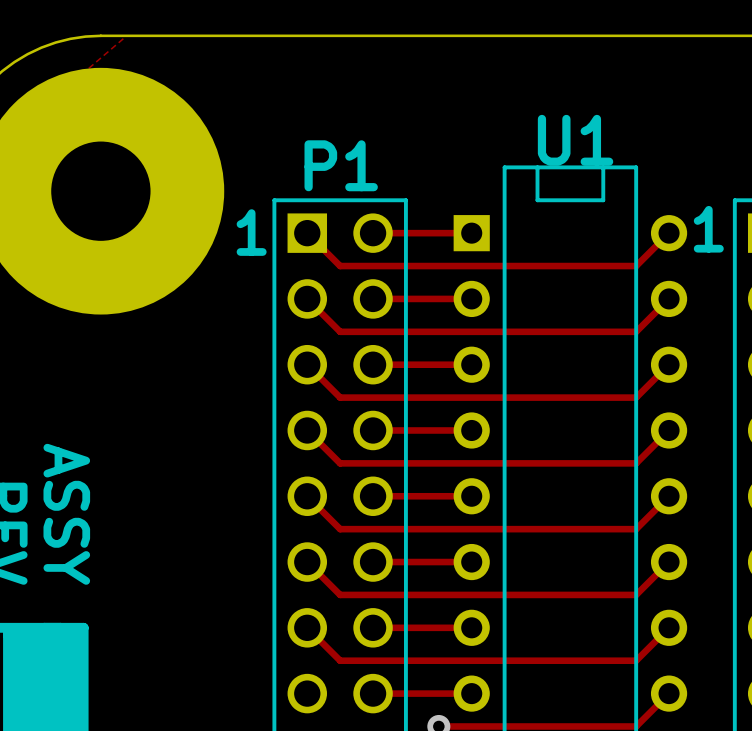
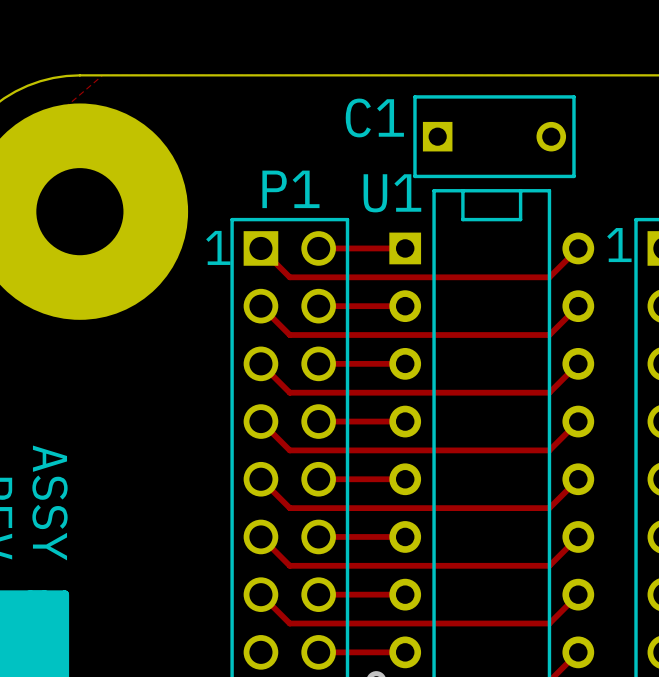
C1: none -> (494, 136)
U1 name position: U1 (575, 140) -> U1 (392, 193)

